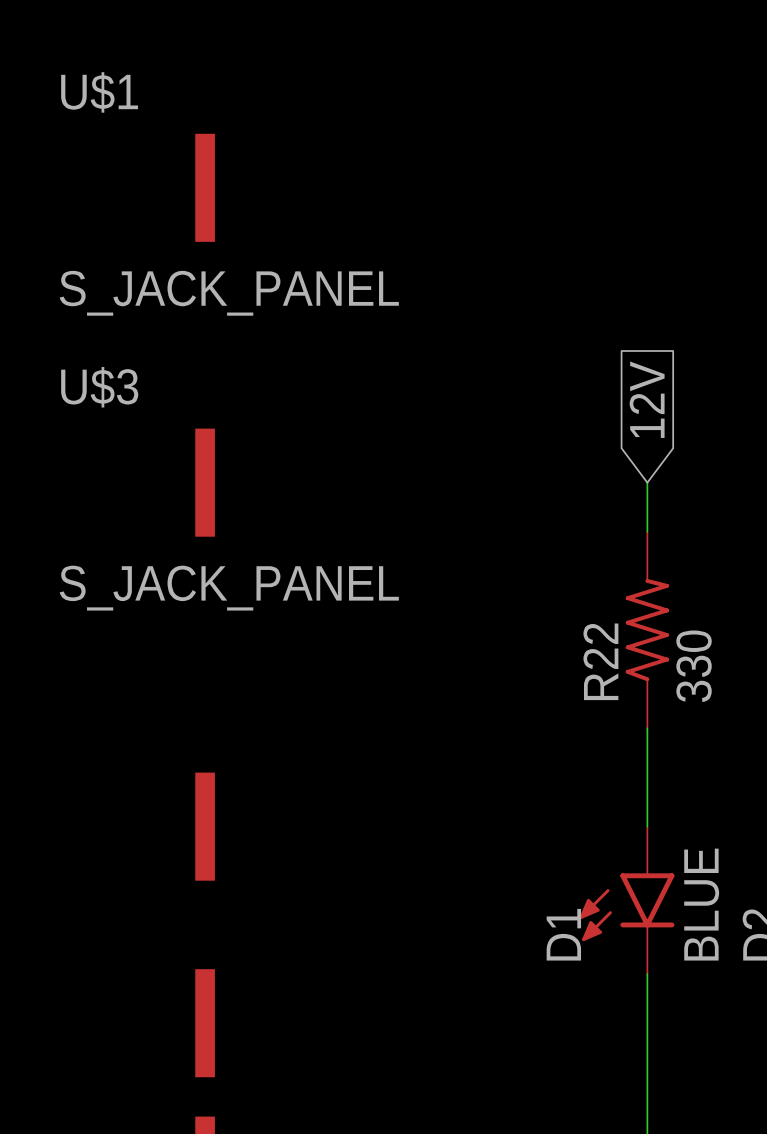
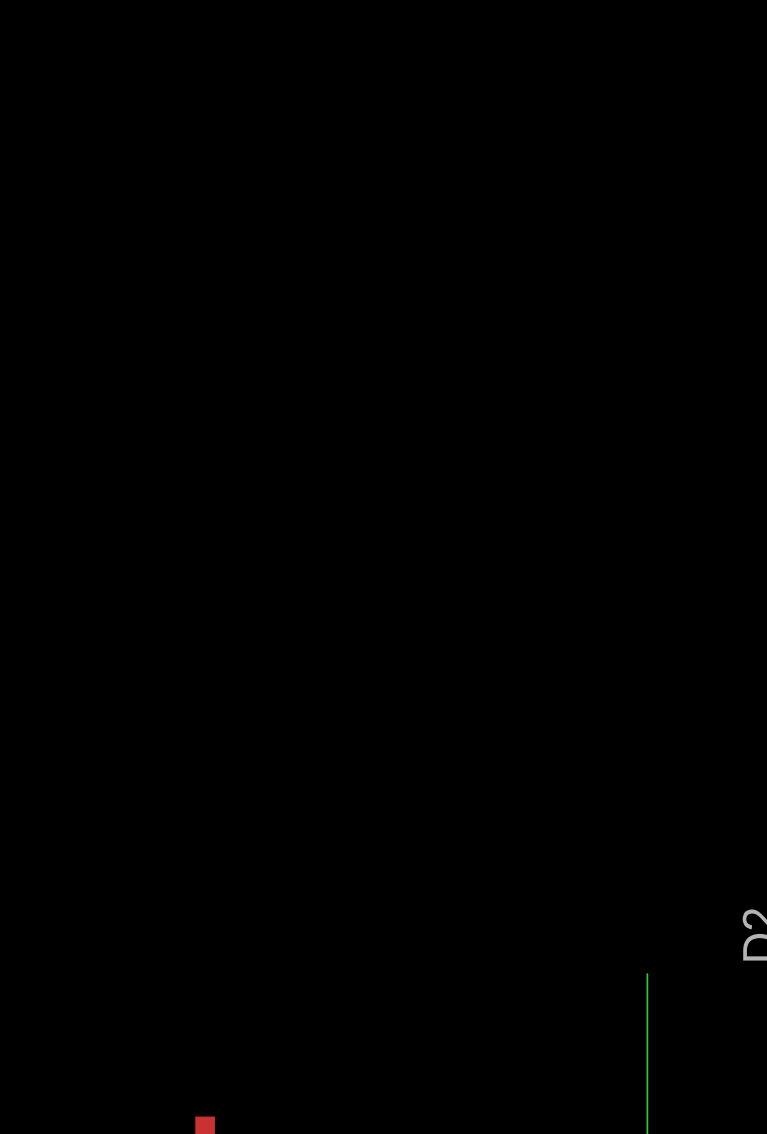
U$1: S_JACK_PANEL (205, 187) -> none
global label: 12V (647, 399) -> none
U$3: S_JACK_PANEL (205, 482) -> none
wire: (647, 482) (647, 531) -> none
R22: 330 (647, 630) -> none
wire: (647, 728) (647, 826) -> none
part: (205, 826) -> none
D1: BLUE (626, 900) -> none
part: (205, 1023) -> none

